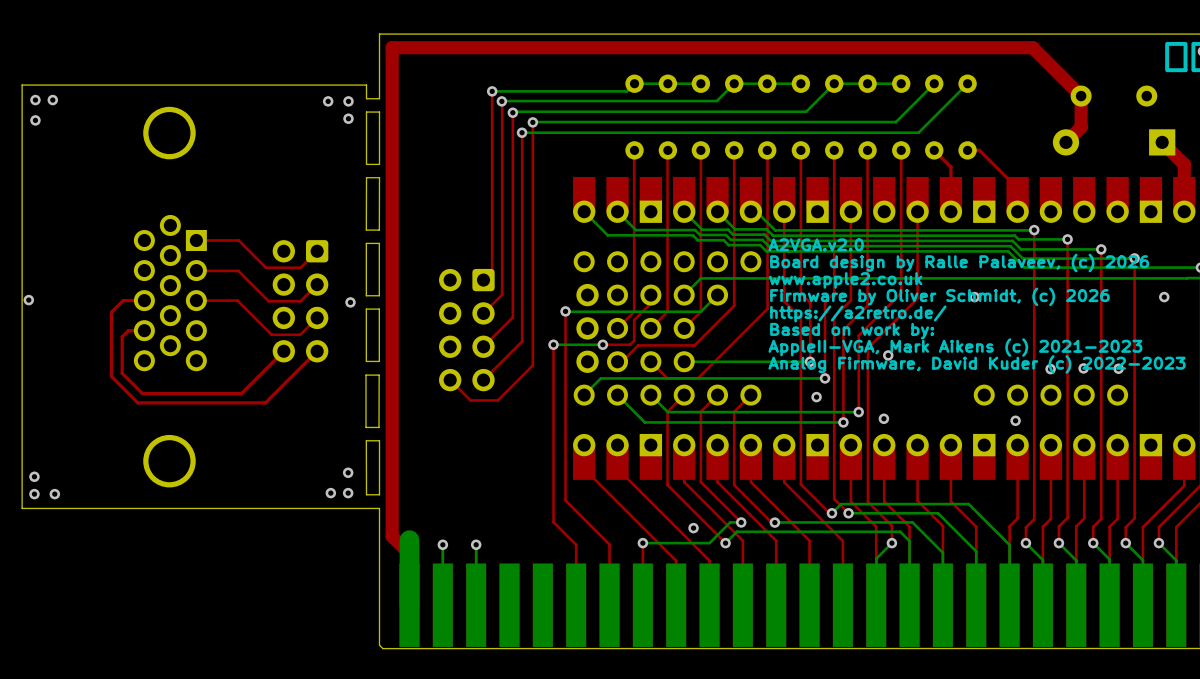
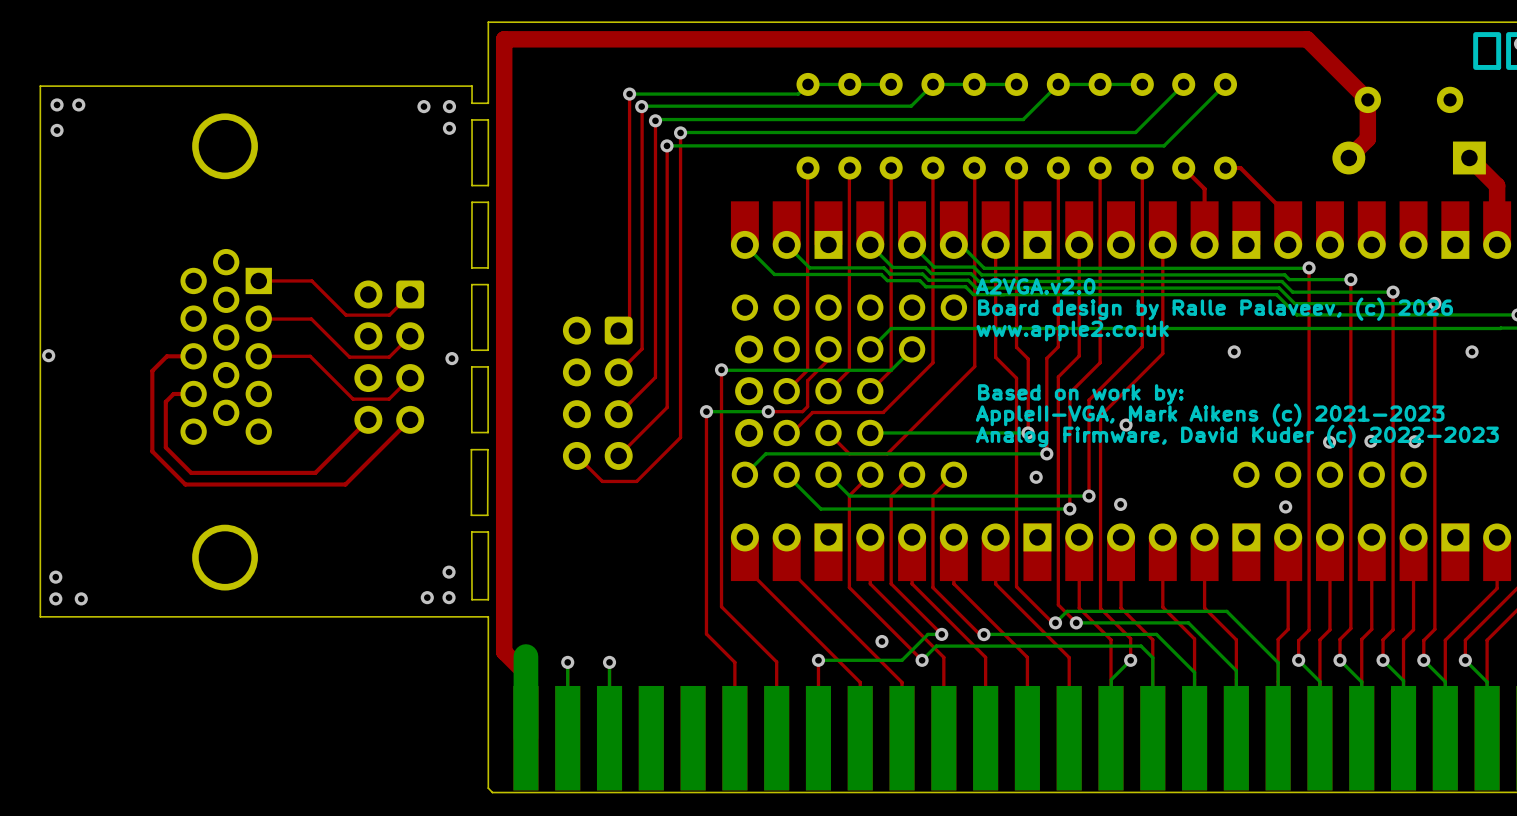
text: Firmware by Oliver Schmidt, (c) 2026 (939, 296) -> none
text: https://a2retro.de/ (858, 313) -> none

